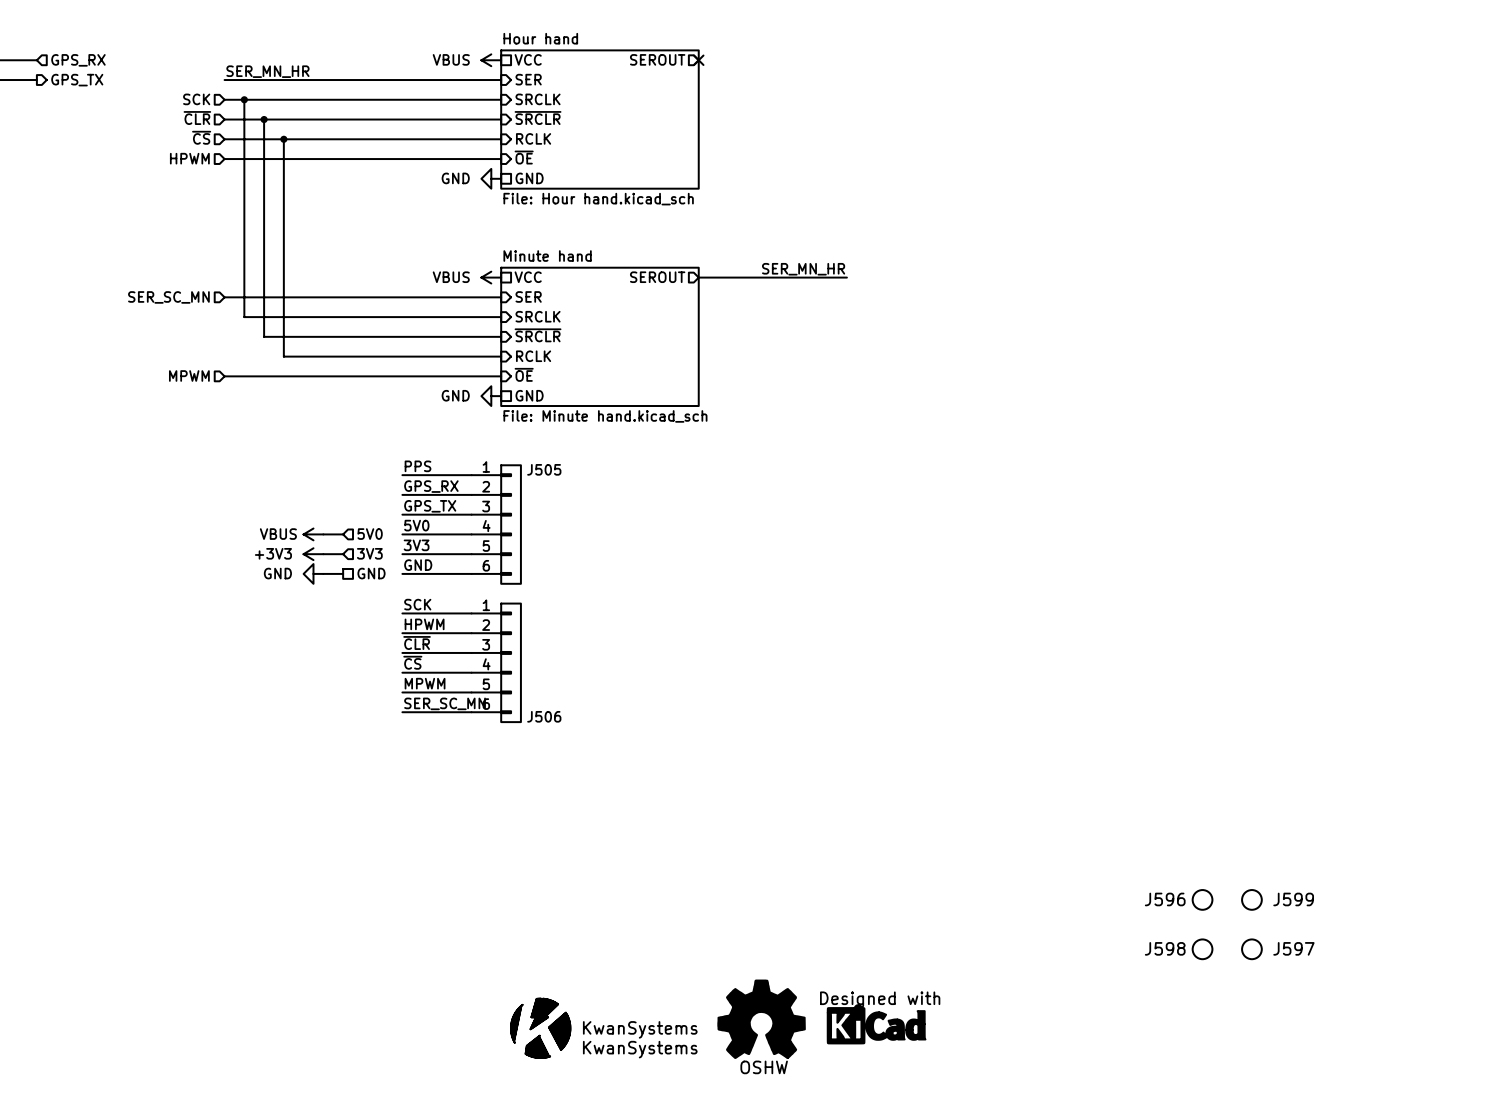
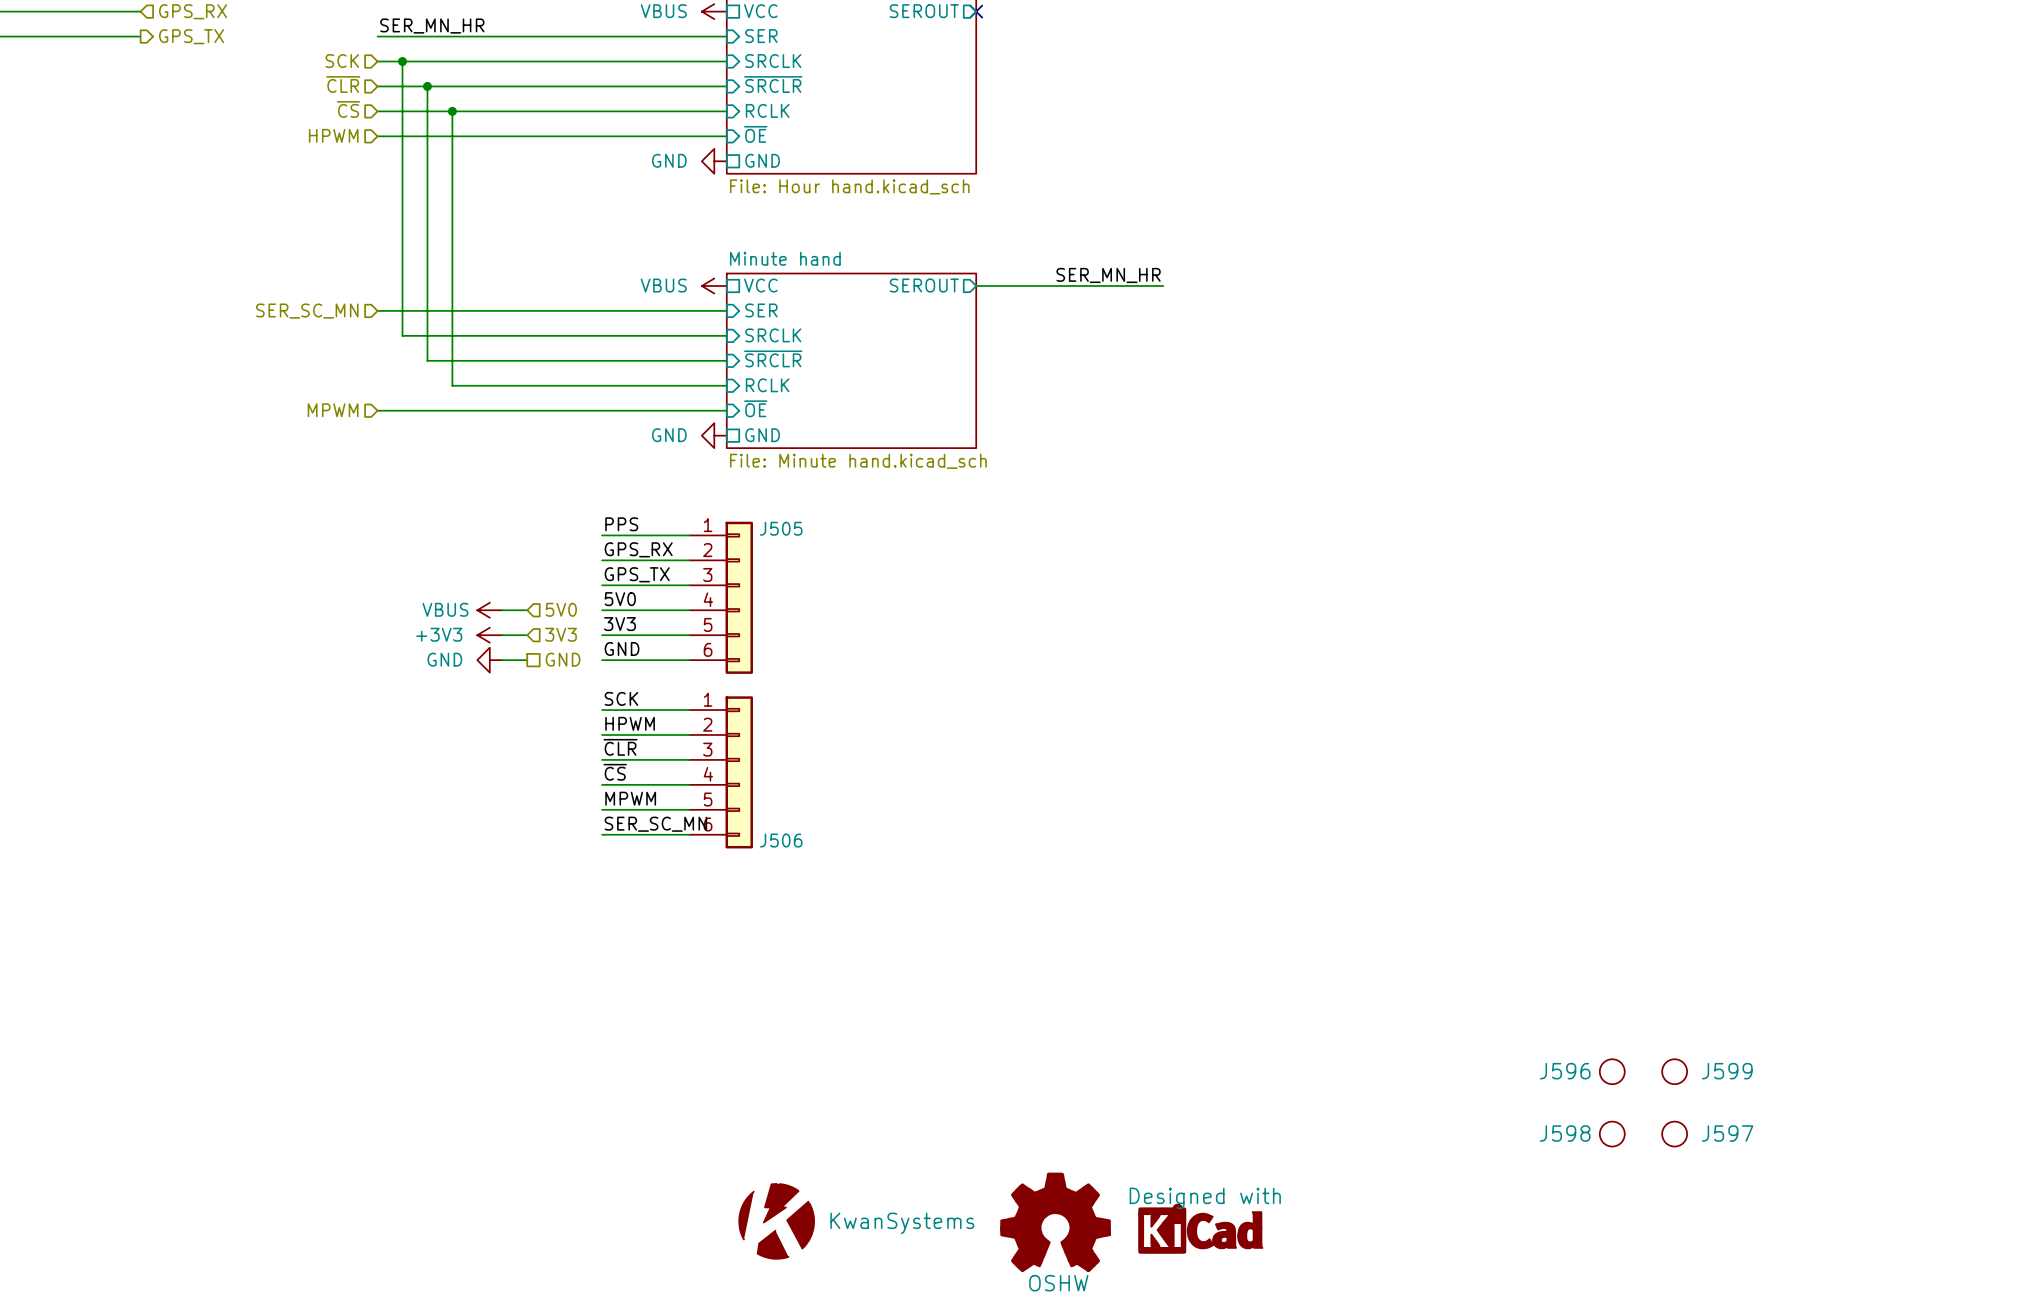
part: none -> KwanSystems (776, 1221)
part: KwanSystems (540, 1028) -> none
part: KwanSystems (540, 1028) -> none

